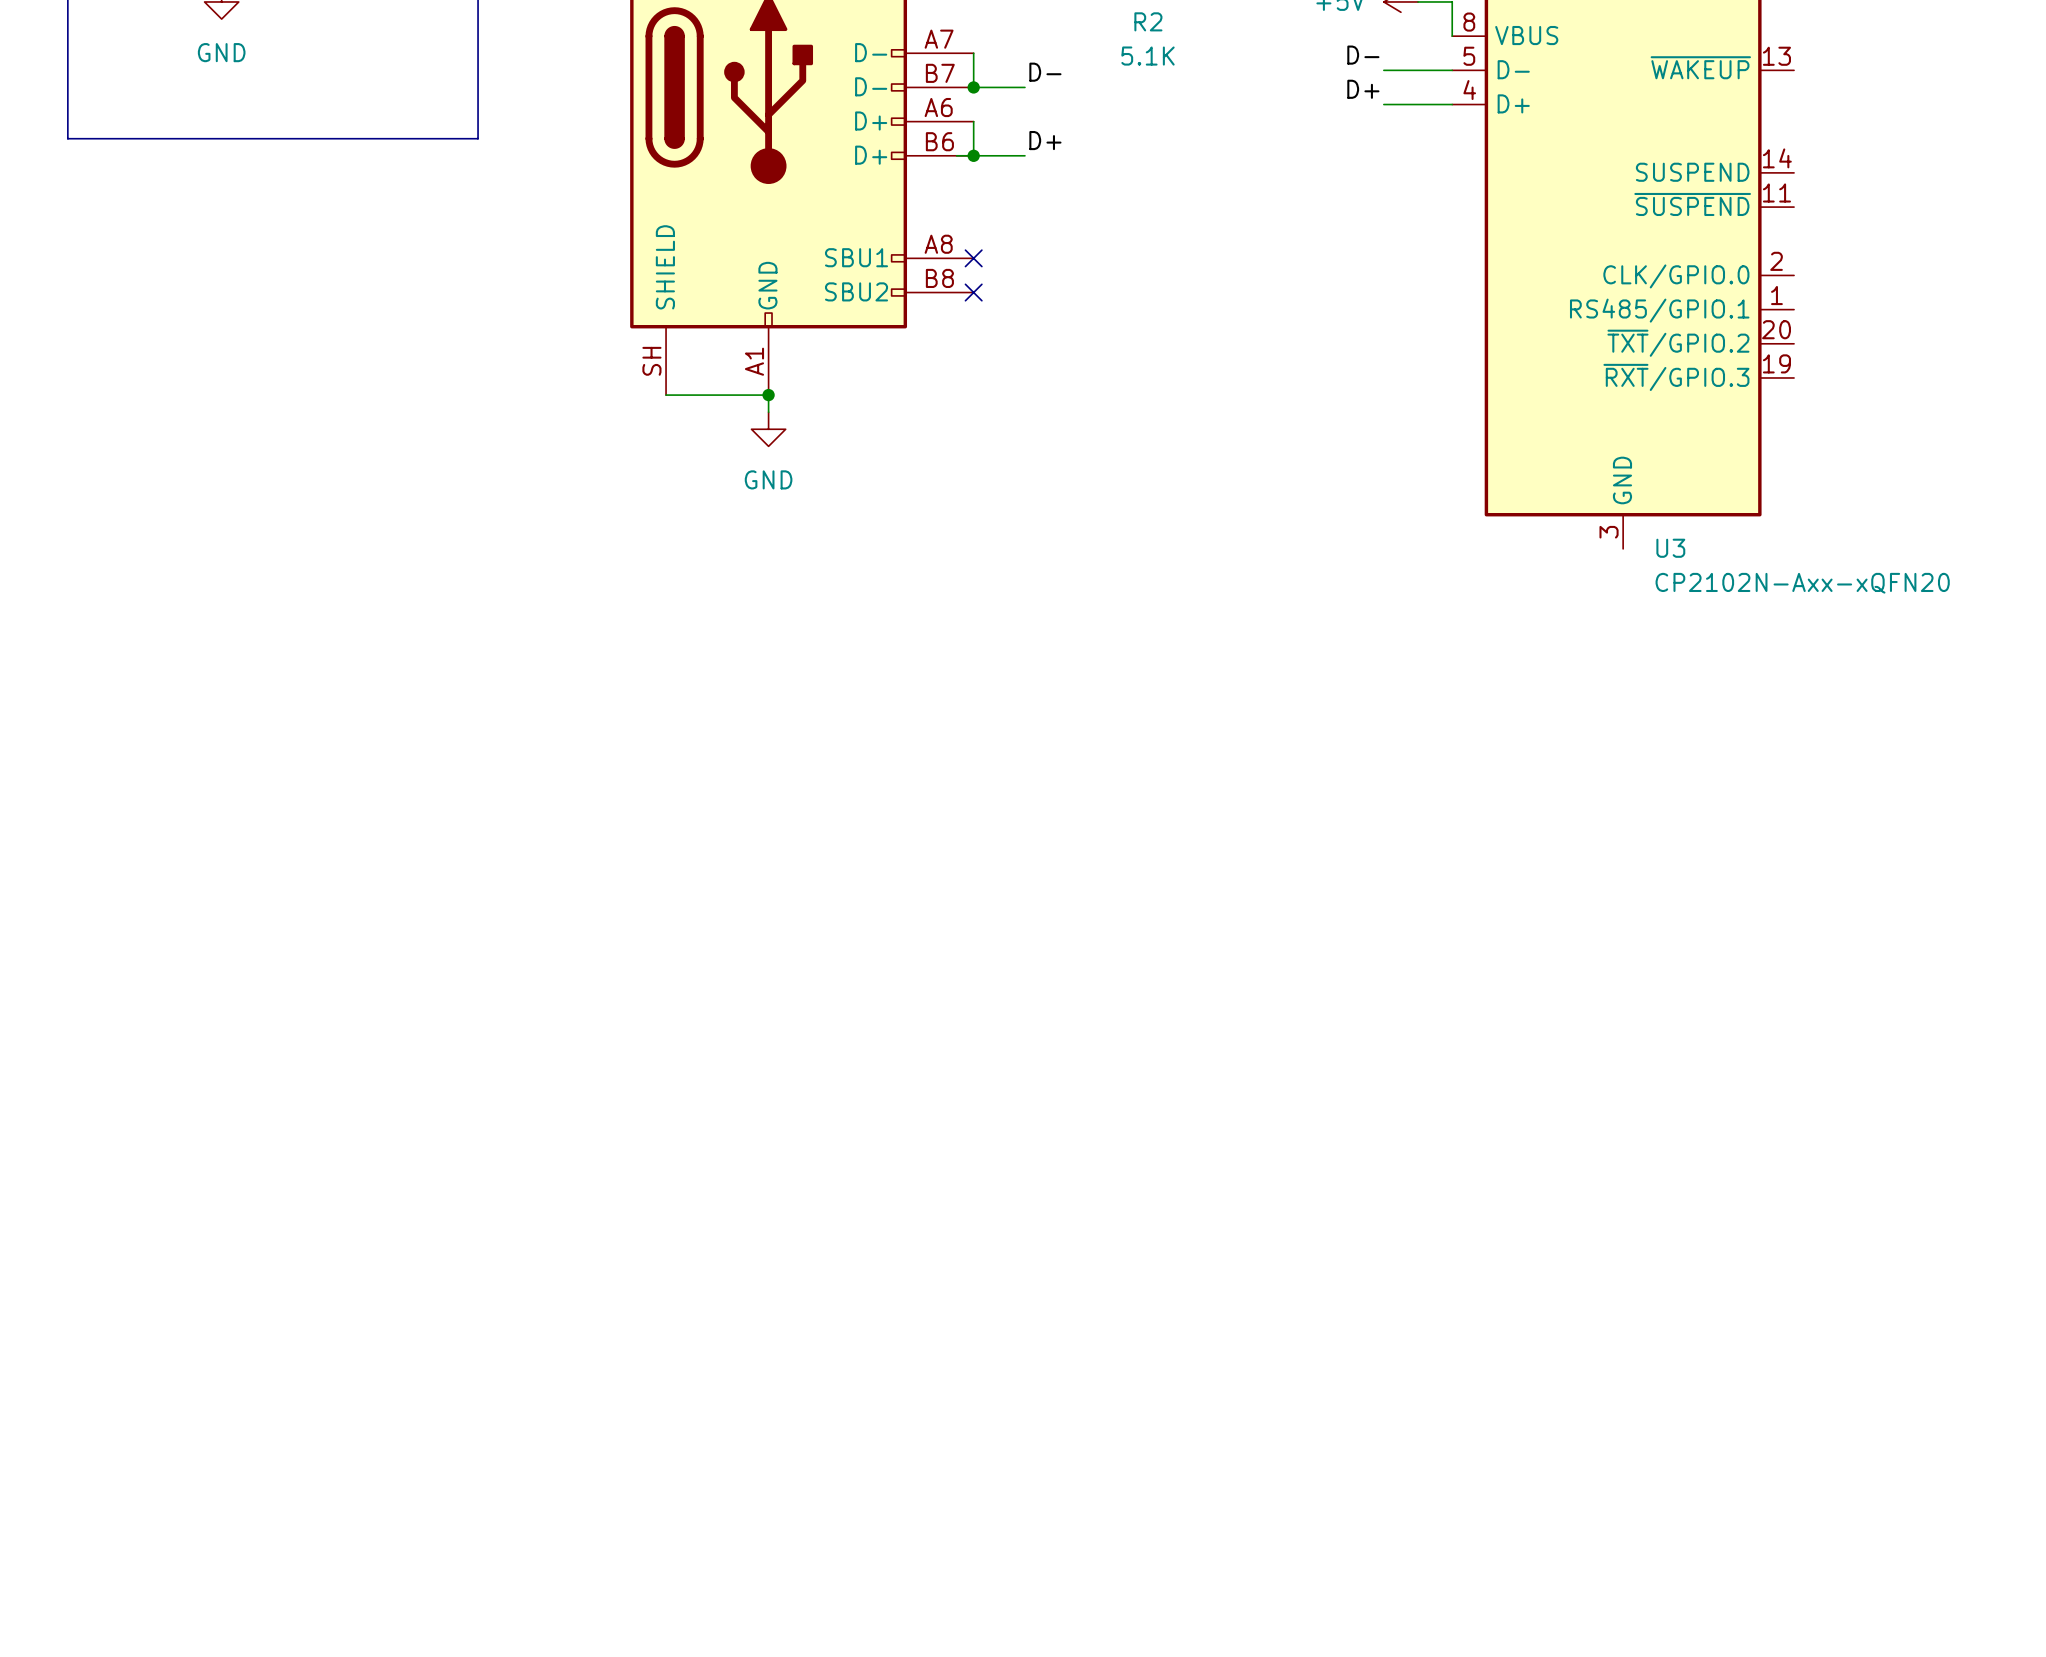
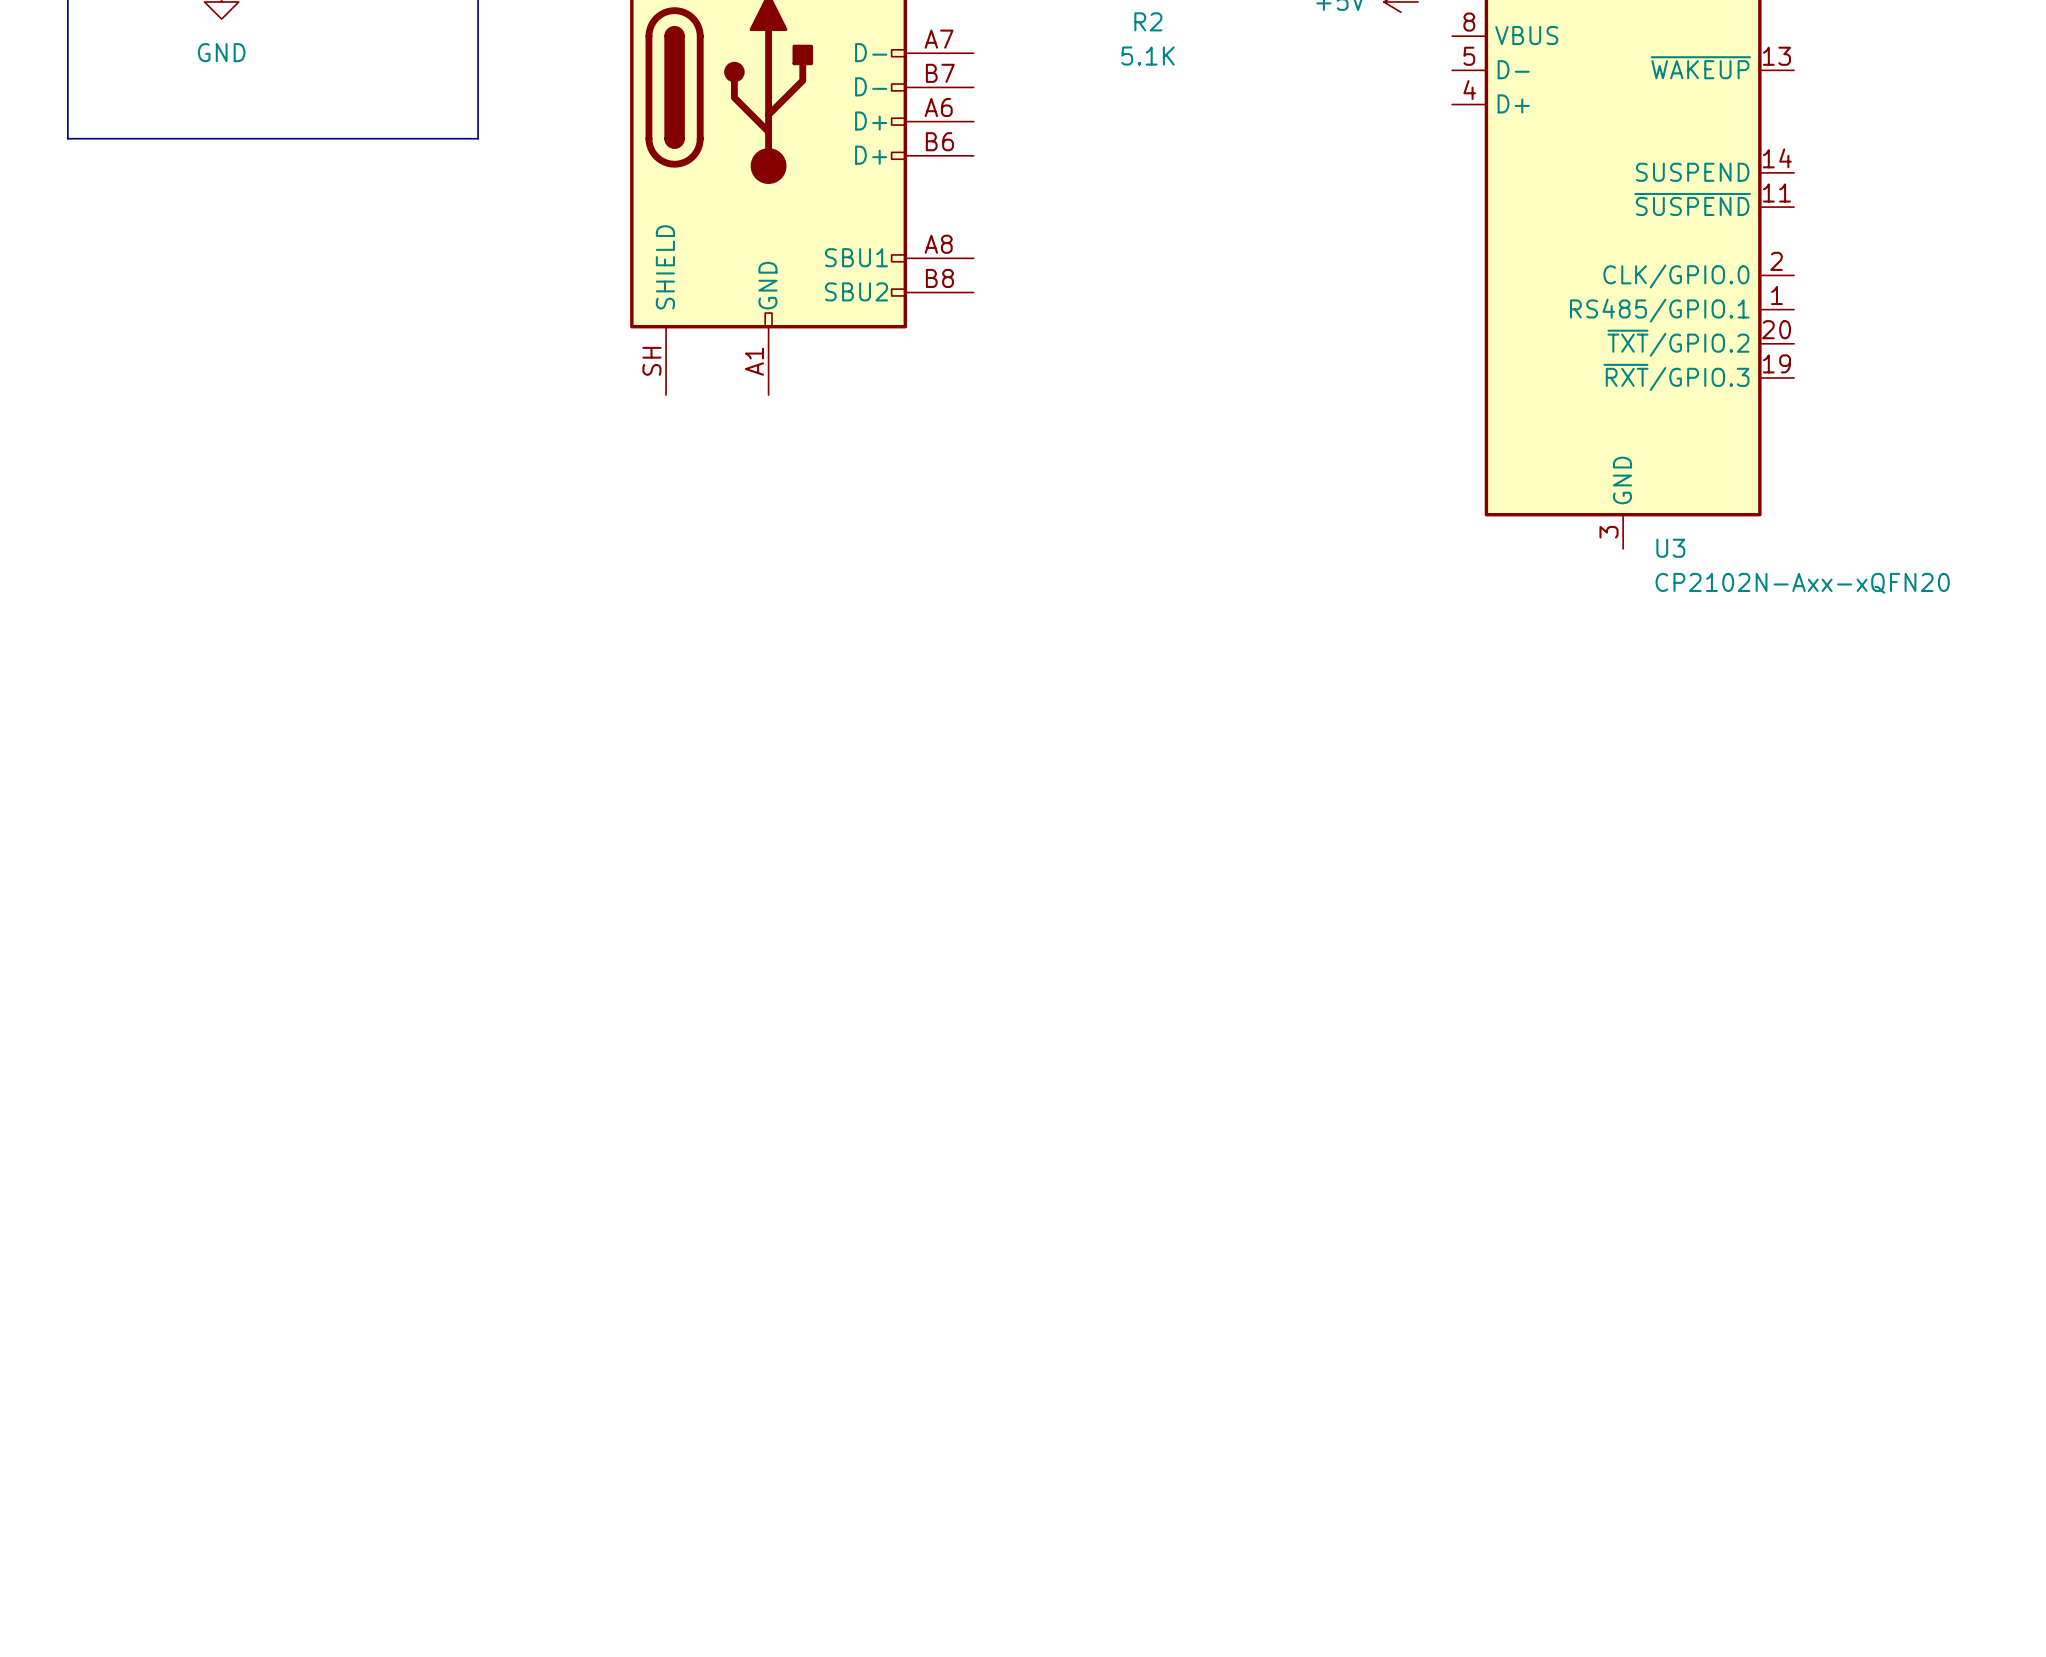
wire: (1418, 1) (1452, 1) (1452, 36) -> none
wire: (973, 53) (973, 87) (1024, 87) -> none
label: D- (1363, 55) -> none
wire: (1383, 70) (1452, 70) -> none
label: D- (1045, 72) -> none
junction: (973, 87) -> none
label: D+ (1363, 89) -> none
wire: (1383, 104) (1452, 104) -> none
wire: (973, 121) (973, 155) -> none
label: D+ (1045, 140) -> none
wire: (956, 155) (1024, 155) -> none
junction: (973, 155) -> none
no-connect mark: (973, 258) -> none
no-connect mark: (973, 292) -> none
wire: (666, 395) (768, 395) (768, 412) -> none
junction: (768, 395) -> none
power symbol: GND (768, 429) -> none

